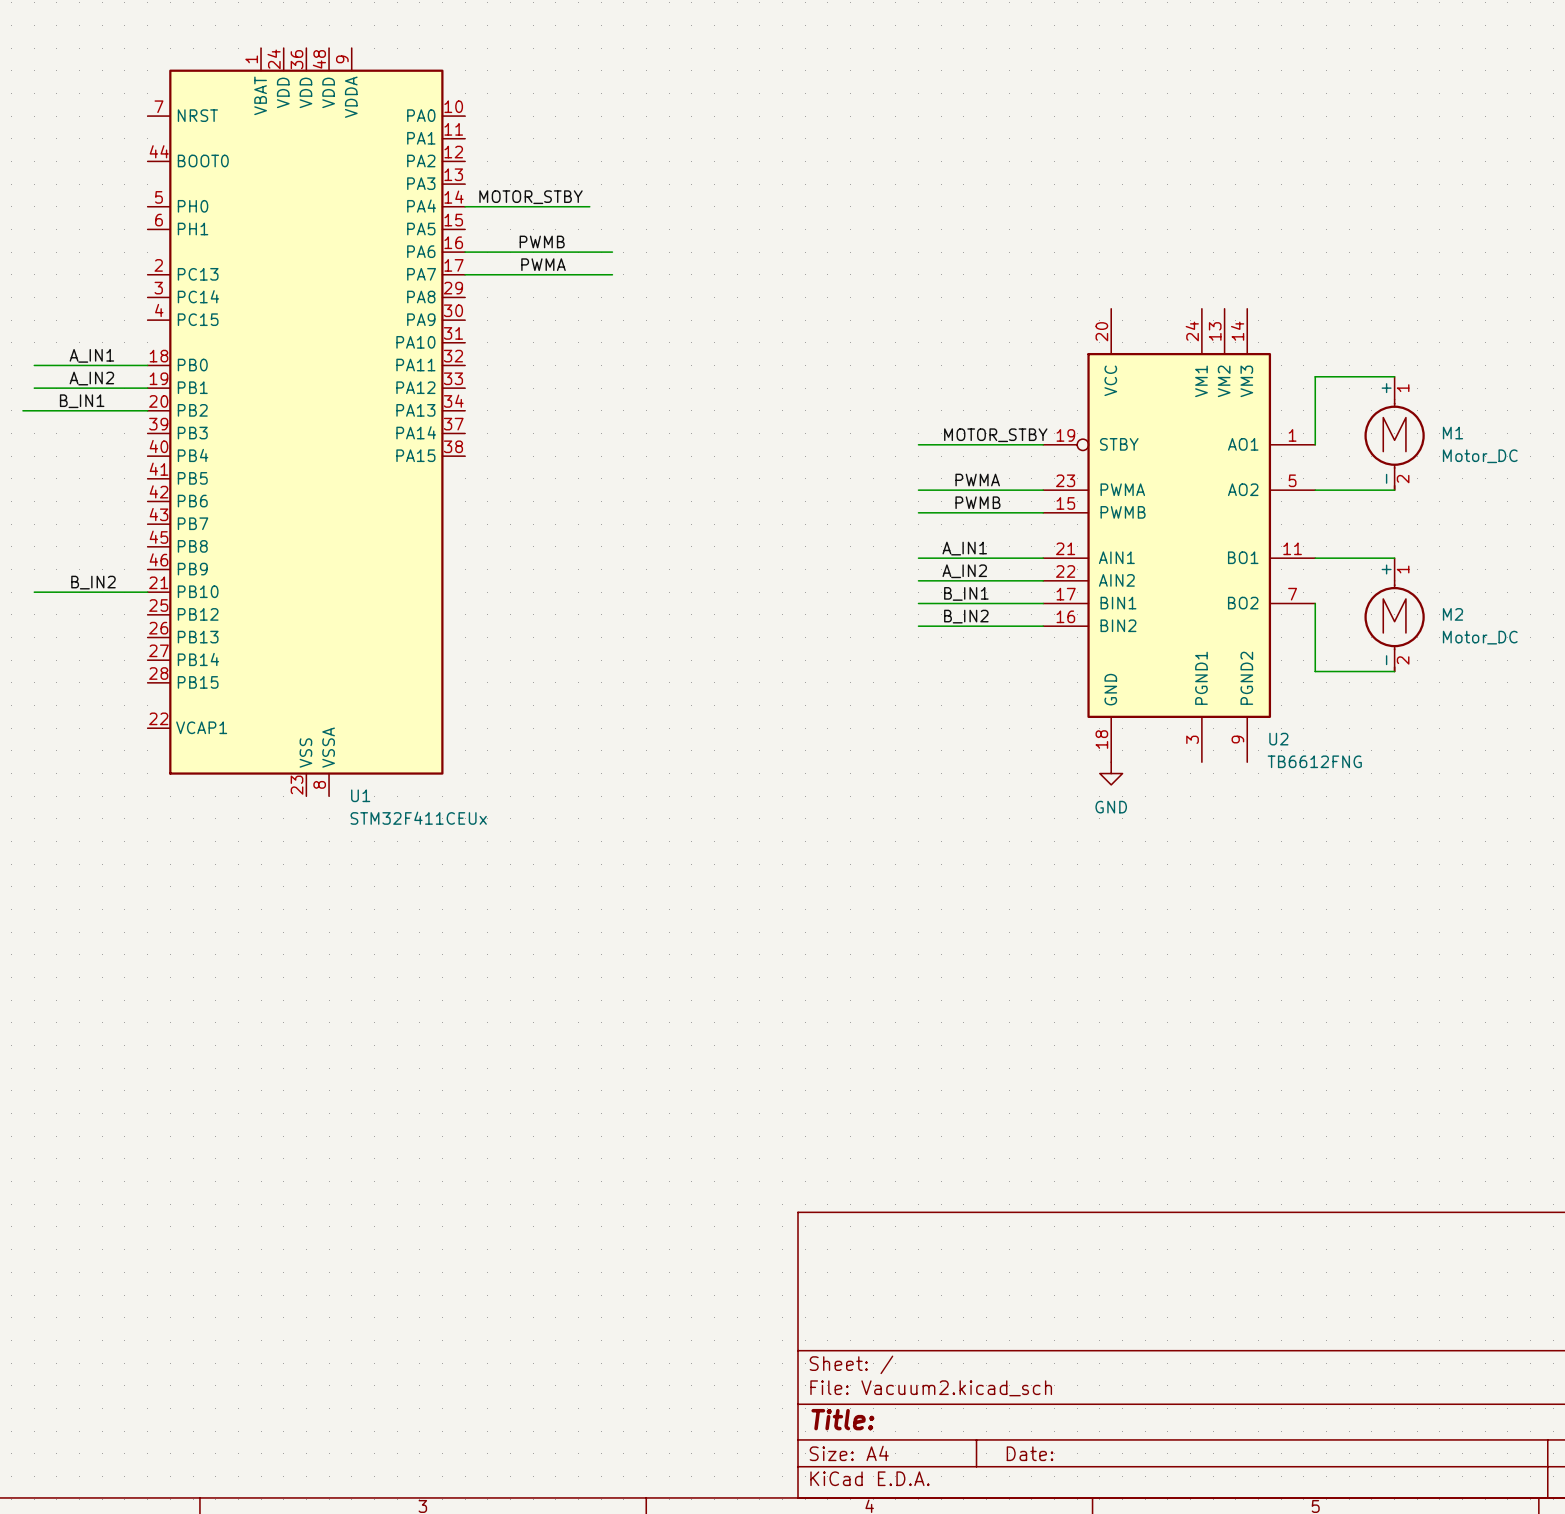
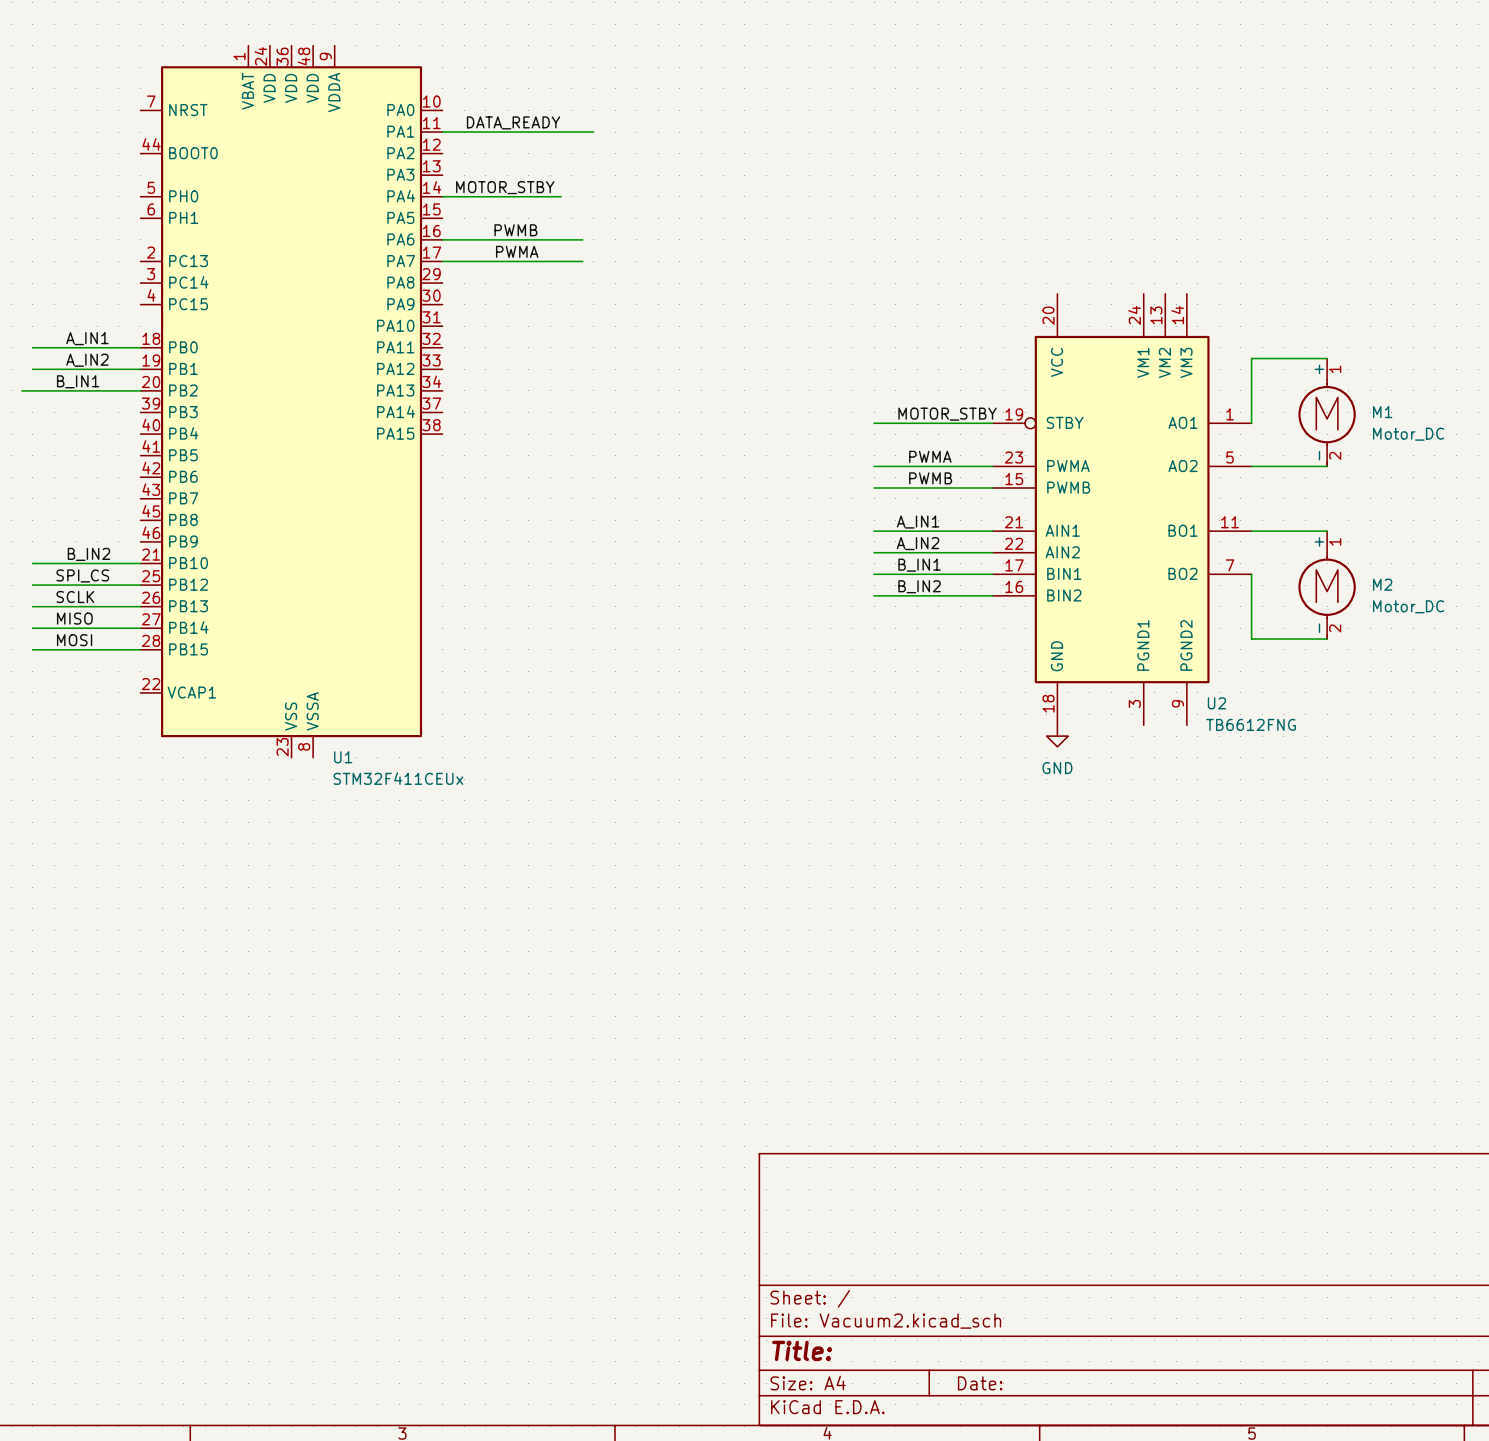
label: none -> DATA_READY (513, 122)
wire: none -> (442, 132) (593, 132)
label: none -> SPI_CS (82, 575)
wire: none -> (32, 585) (140, 585)
label: none -> SCLK (75, 597)
wire: none -> (32, 606) (140, 606)
label: none -> MISO (74, 618)
wire: none -> (32, 628) (140, 628)
label: none -> MOSI (74, 640)
wire: none -> (32, 649) (140, 649)

